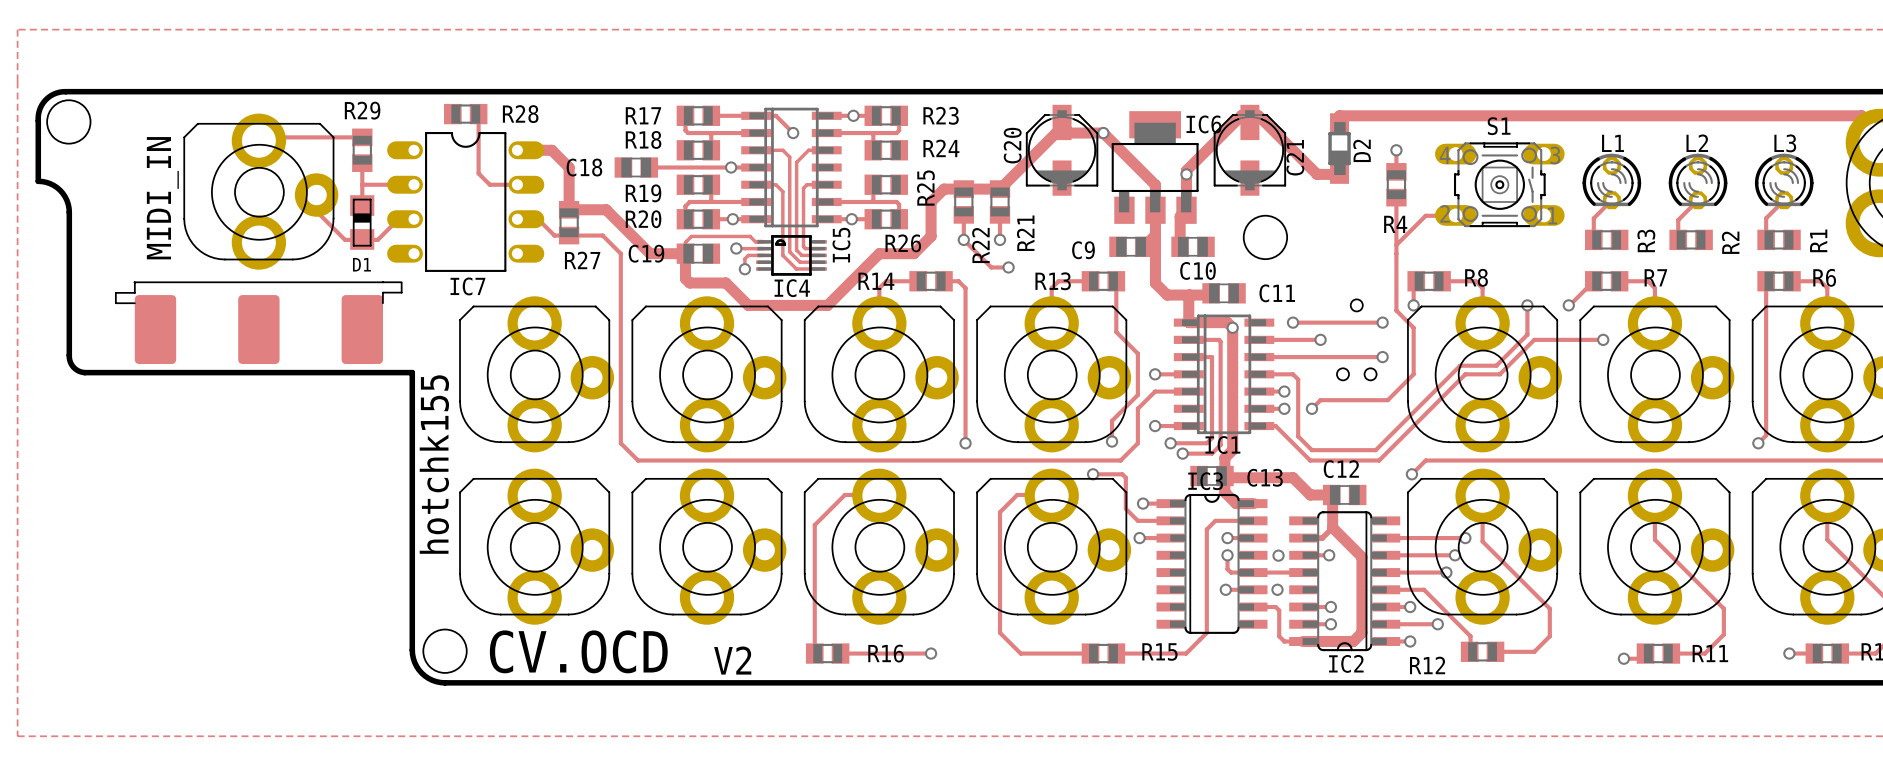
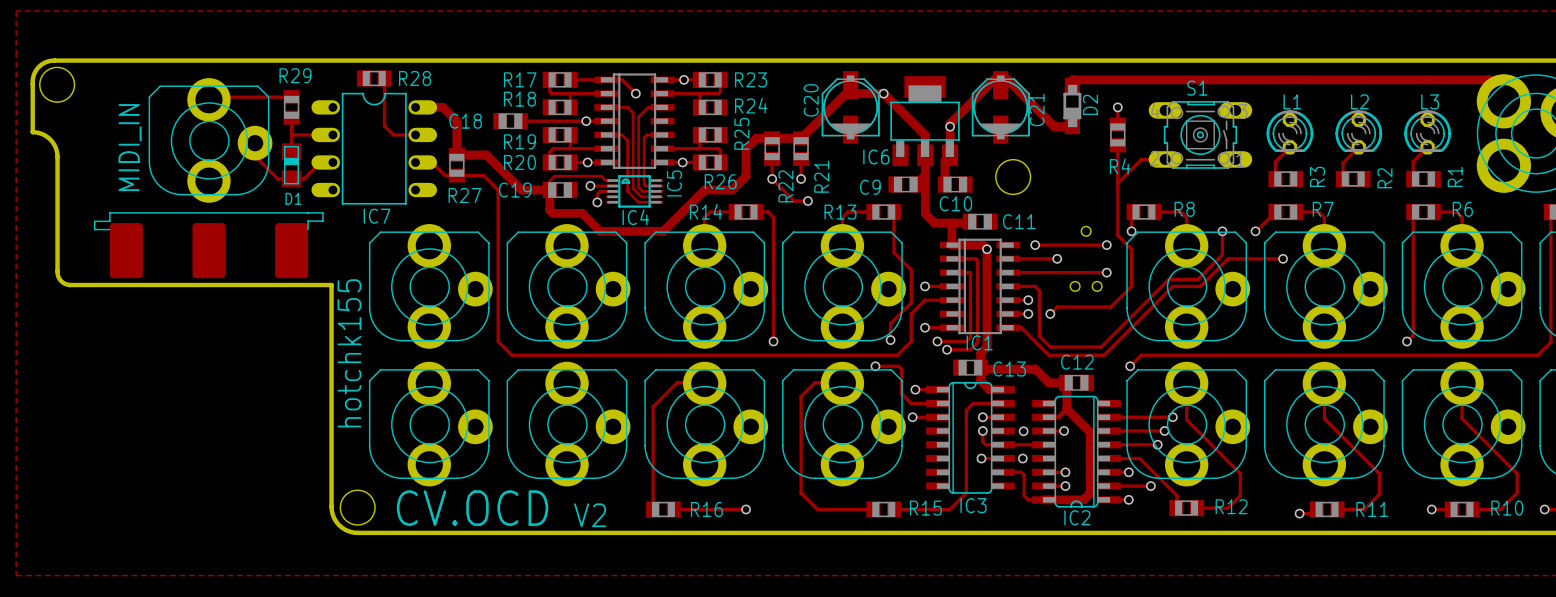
IC6 name position: IC6 (1203, 124) -> IC6 (876, 156)
IC3 name position: IC3 (1205, 481) -> IC3 (973, 505)
R12 name position: R12 (1427, 665) -> R12 (1231, 506)

